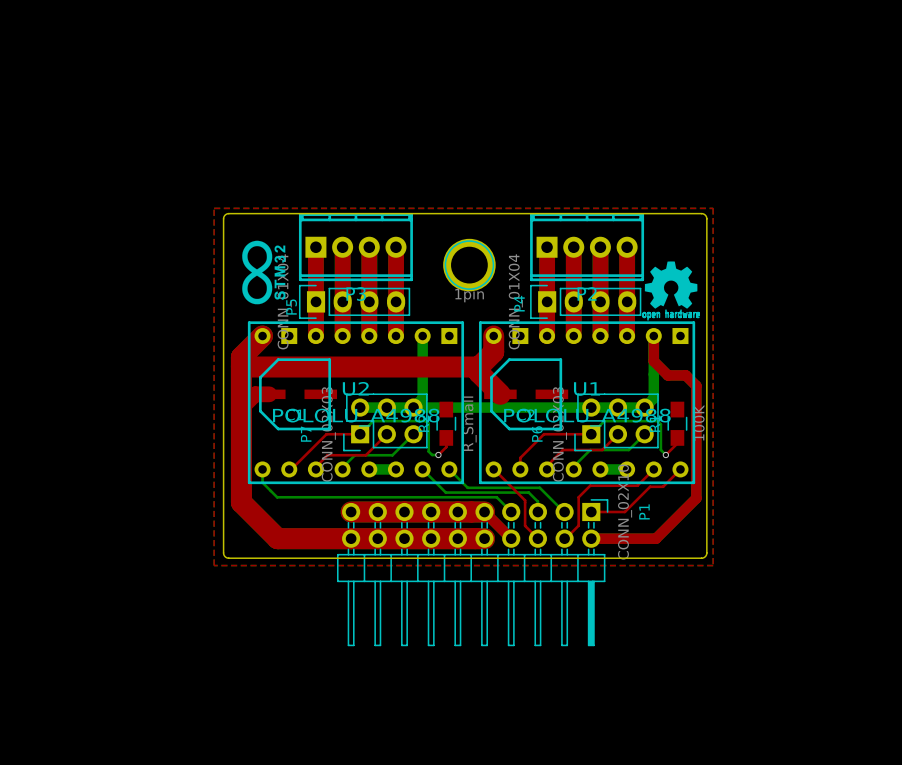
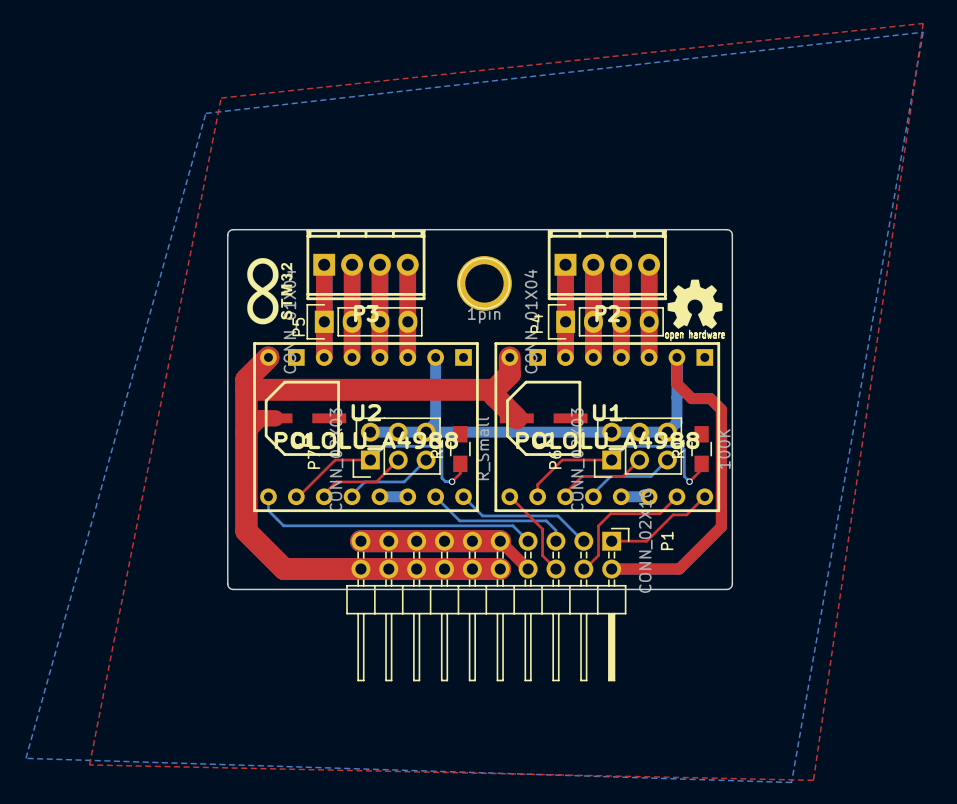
top zone outline: none -> (923, 23) (221, 98) (89, 764) (813, 780) (923, 23)
bottom zone outline: none -> (923, 32) (205, 113) (25, 758) (791, 782) (923, 32)
top zone outline: (214, 208) (214, 565) (713, 565) (713, 208) (214, 208) -> none

